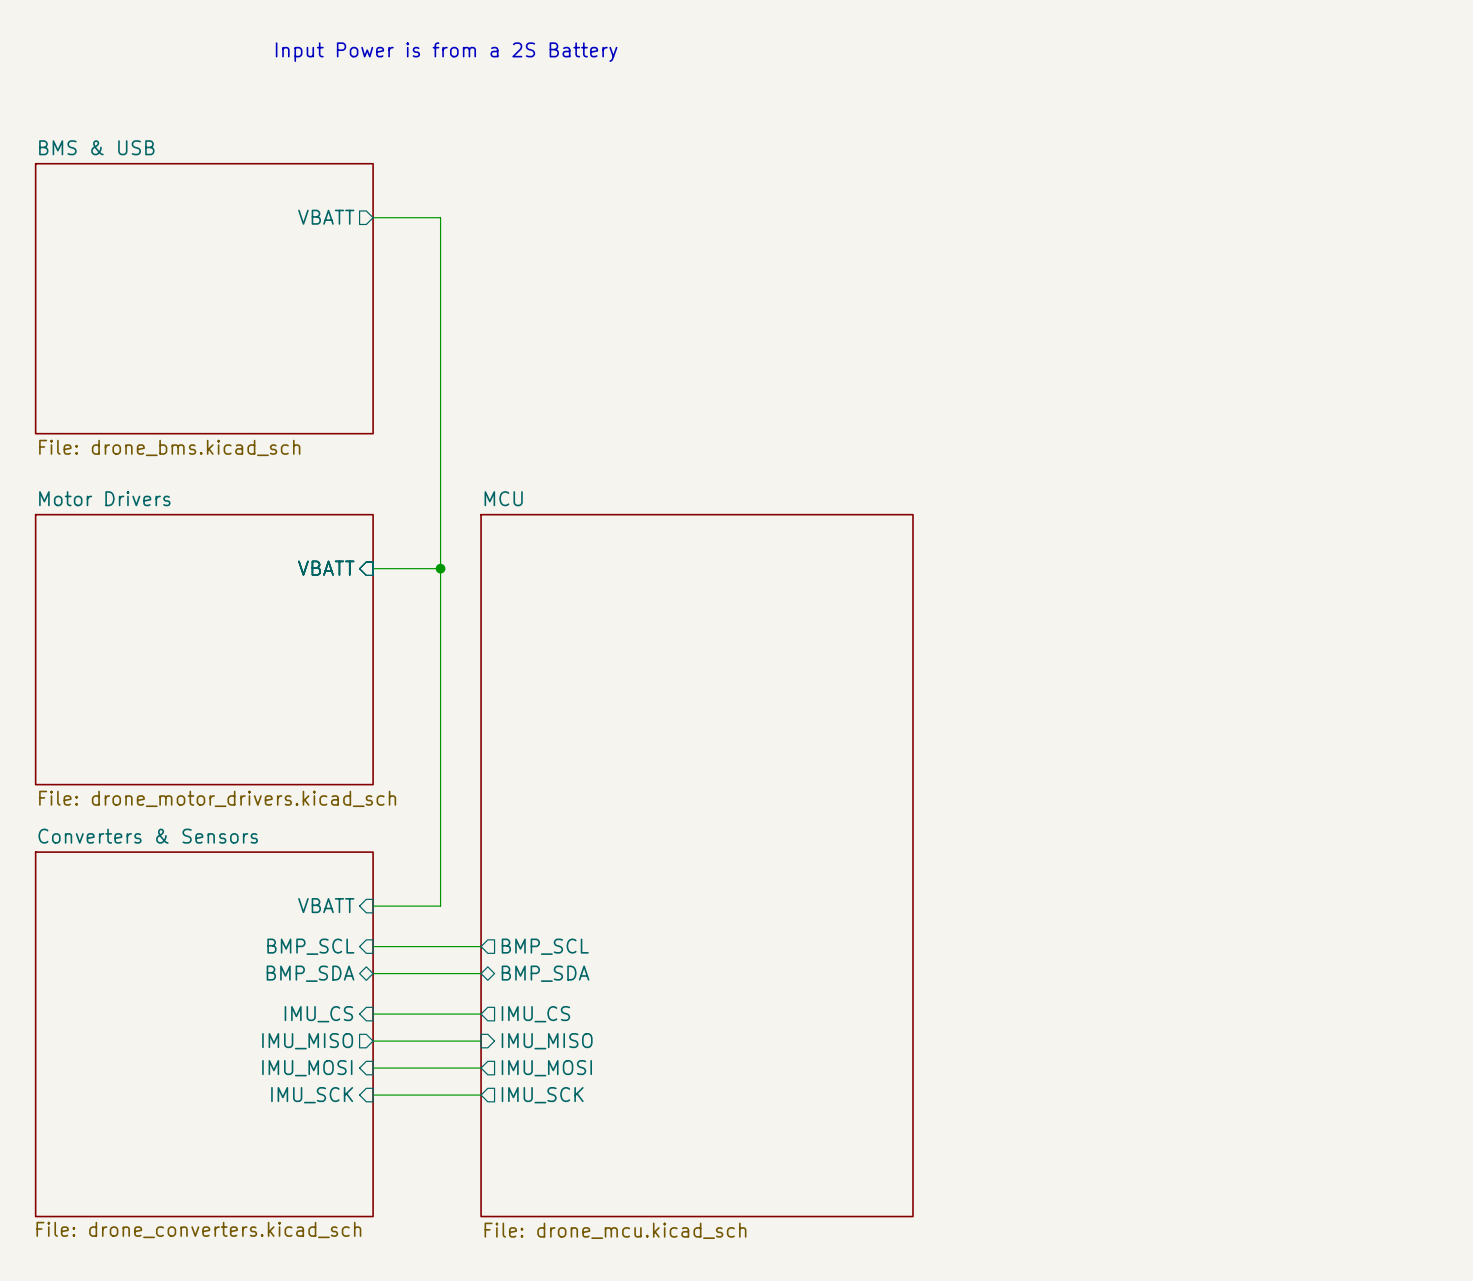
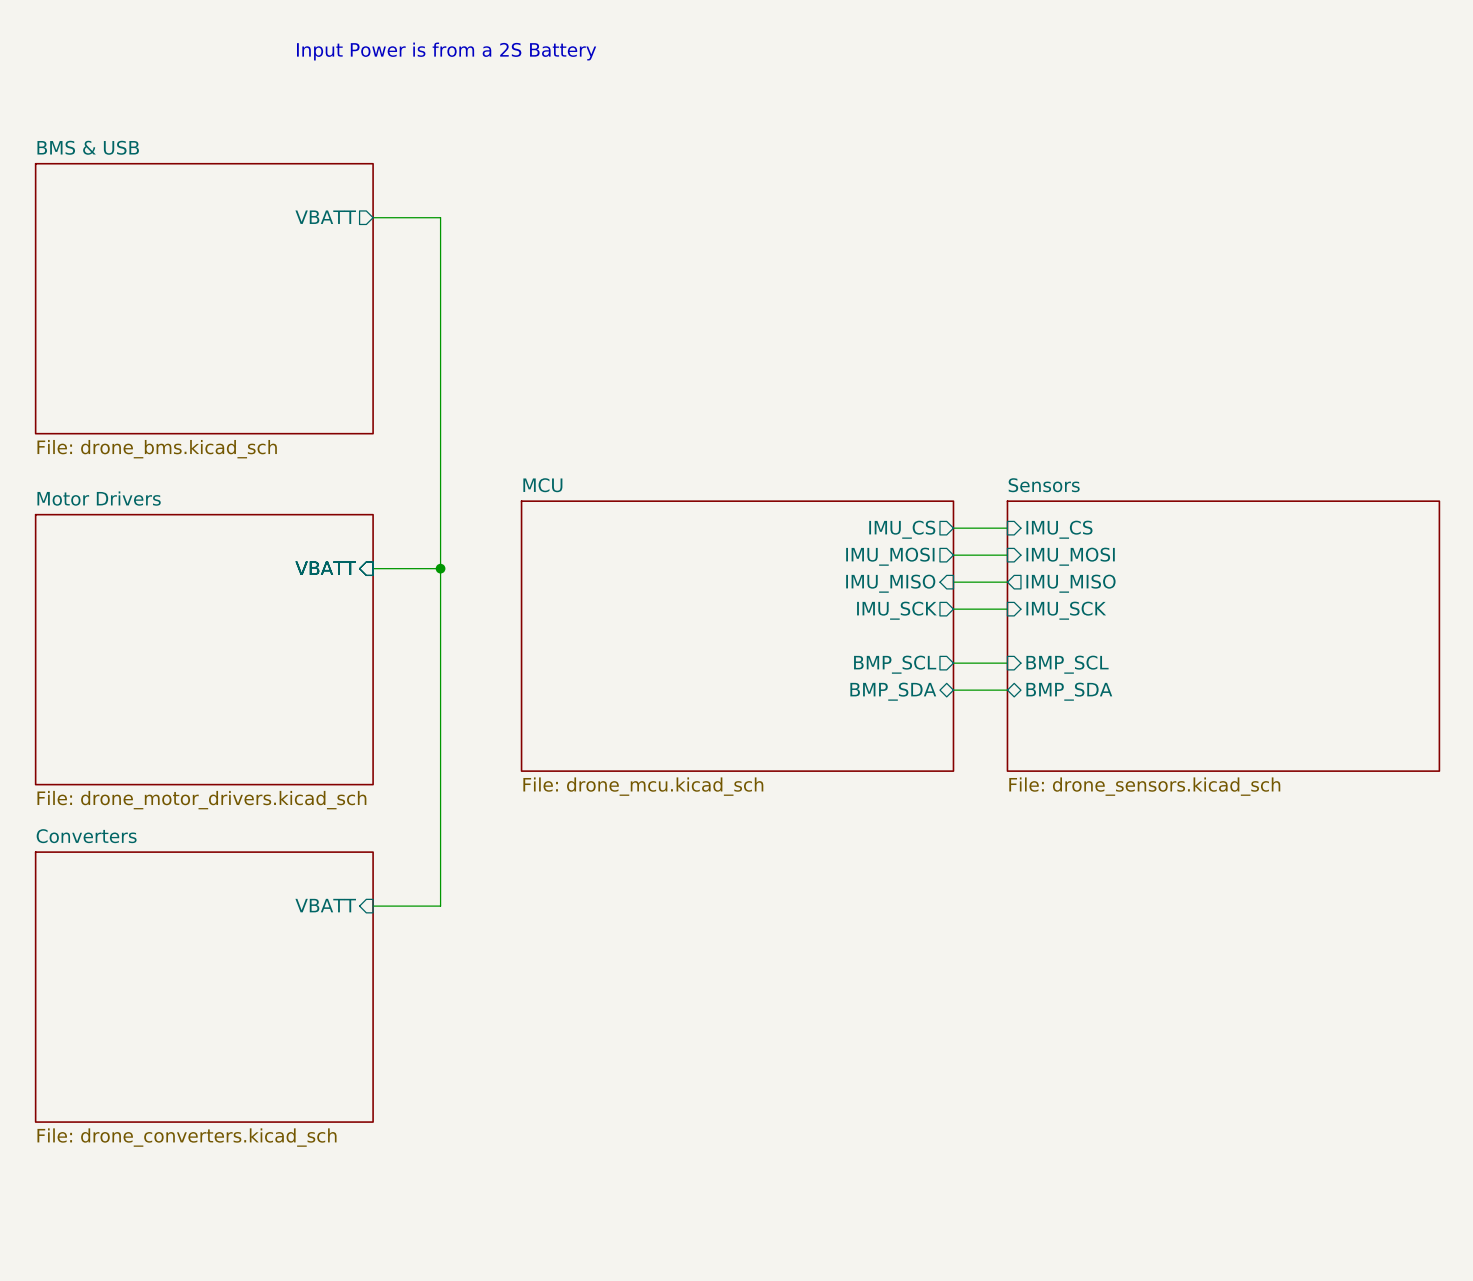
sheet pin: none -> IMU_CS (902, 529)
wire: none -> (953, 528) (1007, 528)
sheet pin: none -> IMU_CS (1059, 529)
sheet pin: none -> IMU_MOSI (890, 556)
wire: none -> (953, 555) (1007, 555)
sheet pin: none -> IMU_MOSI (1070, 556)
sheet pin: none -> IMU_MISO (890, 583)
wire: none -> (953, 582) (1007, 582)
sheet pin: none -> IMU_MISO (1071, 583)
sheet pin: none -> IMU_SCK (896, 610)
wire: none -> (953, 609) (1007, 609)
sheet pin: none -> IMU_SCK (1066, 610)
sheet MCU: none -> File: drone_mcu.kicad_sch (737, 636)
sheet Sensors: none -> File: drone_sensors.kicad_sch (1223, 636)
sheet pin: none -> BMP_SCL (895, 664)
wire: none -> (953, 663) (1007, 663)
sheet pin: none -> BMP_SCL (1067, 664)
sheet pin: none -> BMP_SDA (893, 691)
wire: none -> (953, 690) (1007, 690)
sheet pin: none -> BMP_SDA (1069, 691)
sheet MCU: File: drone_mcu.kicad_sch (697, 865) -> none
sheet pin: BMP_SCL (310, 946) -> none
wire: (373, 946) (481, 946) -> none
sheet pin: BMP_SCL (545, 946) -> none
sheet pin: BMP_SDA (310, 973) -> none
wire: (373, 973) (481, 973) -> none
sheet pin: BMP_SDA (545, 973) -> none
sheet Converters: none -> File: drone_converters.kicad_sch (204, 987)
sheet pin: IMU_CS (318, 1014) -> none
wire: (373, 1014) (481, 1014) -> none
sheet pin: IMU_CS (535, 1014) -> none
sheet Converters & Sensors: File: drone_converters.kicad_sch (204, 1034) -> none
sheet pin: IMU_MISO (307, 1041) -> none
wire: (373, 1041) (481, 1041) -> none
sheet pin: IMU_MISO (547, 1041) -> none
sheet pin: IMU_MOSI (307, 1068) -> none
wire: (373, 1068) (481, 1068) -> none
sheet pin: IMU_MOSI (546, 1068) -> none
sheet pin: IMU_SCK (312, 1095) -> none
wire: (373, 1095) (481, 1095) -> none
sheet pin: IMU_SCK (542, 1095) -> none

